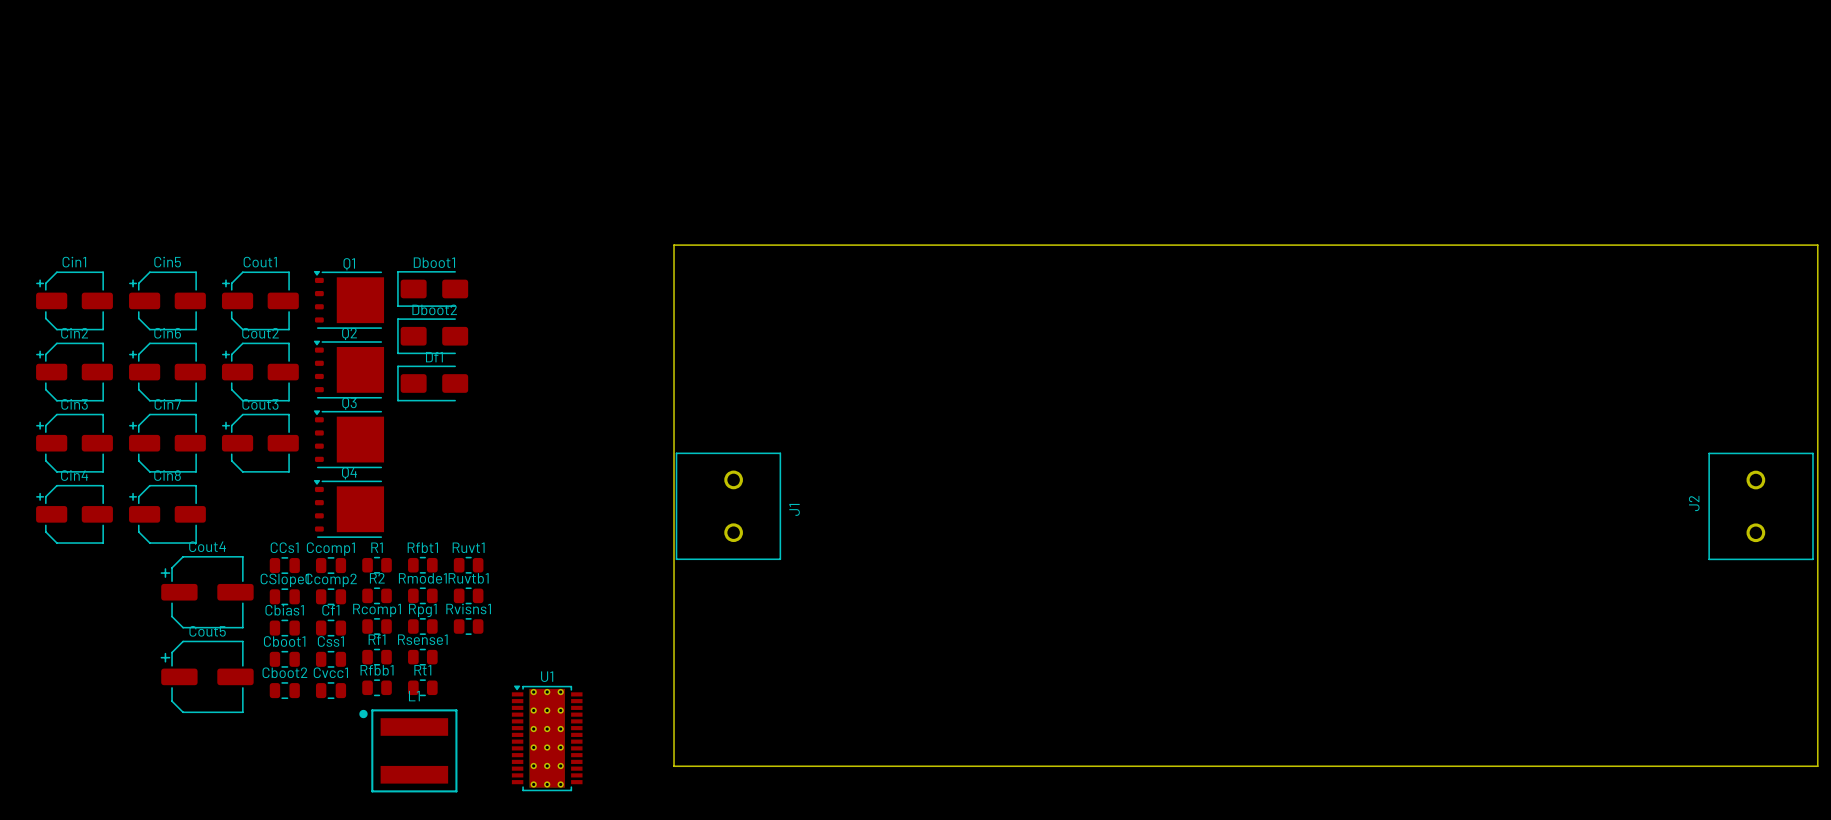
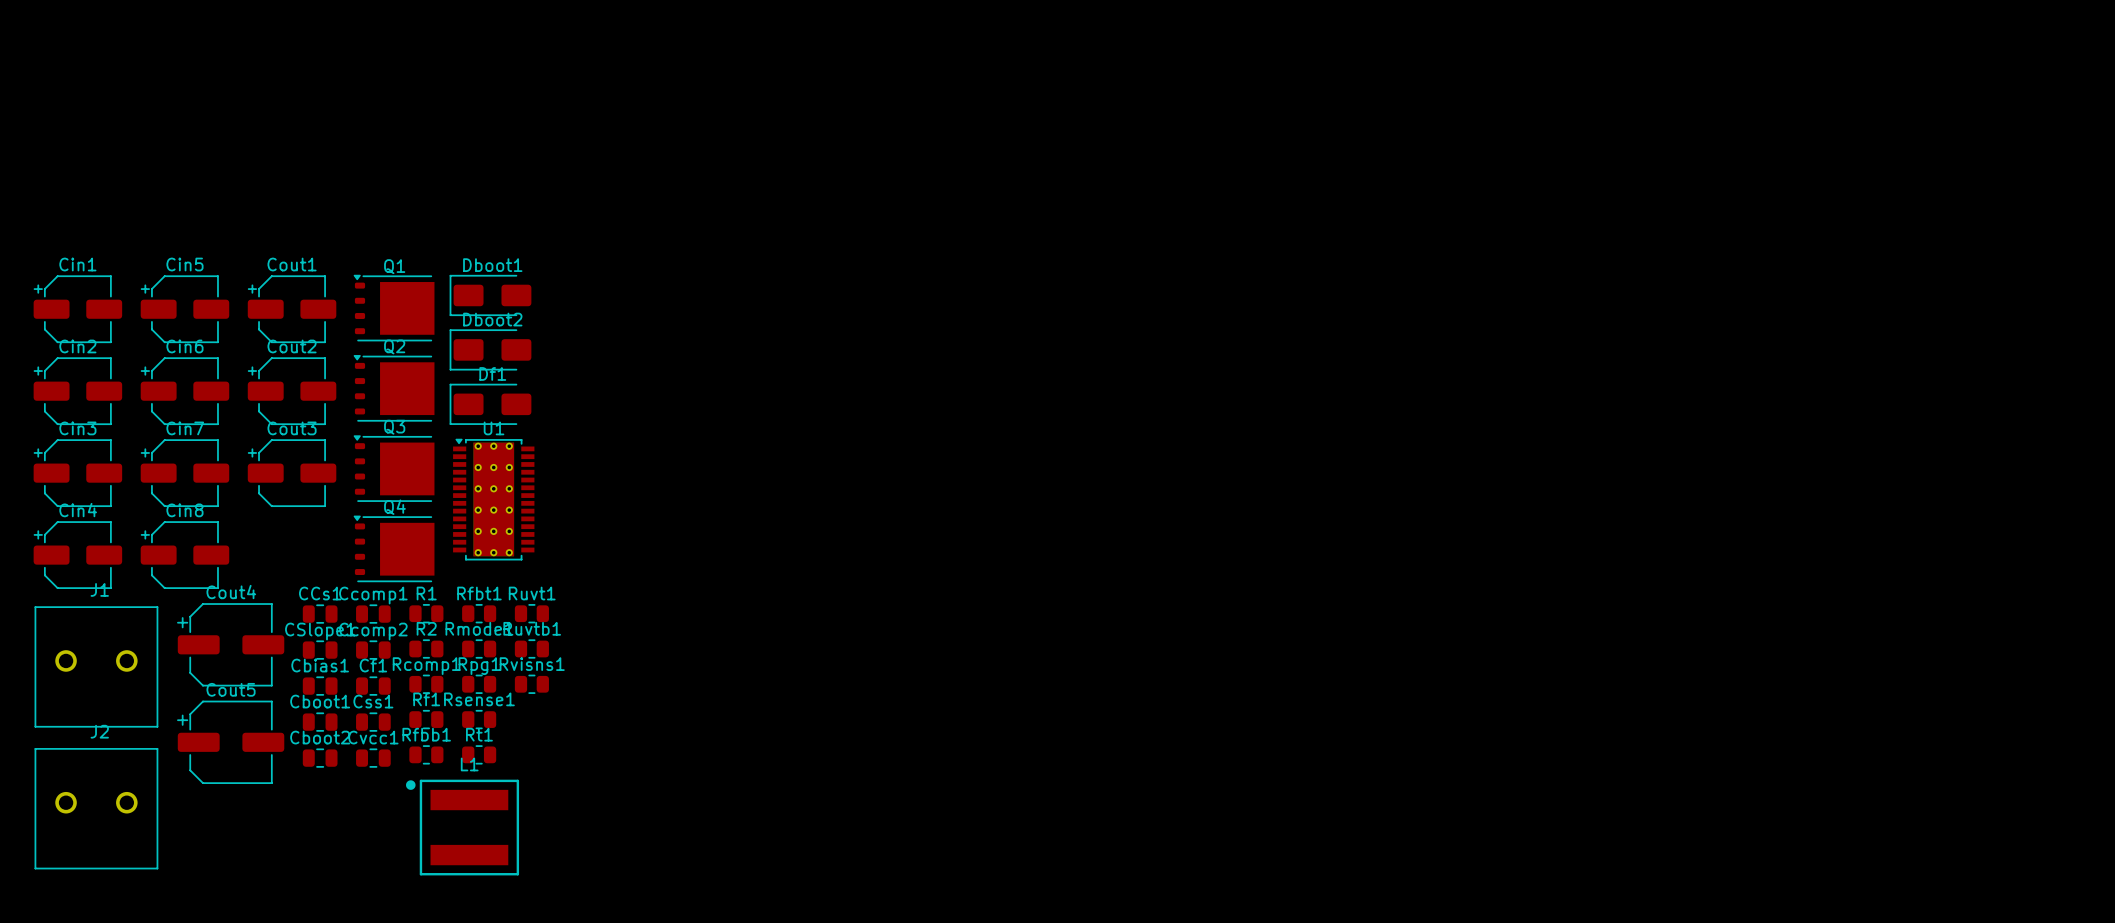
board edge: (674, 245) (1817, 245) (1817, 766) (674, 766) (674, 245) -> none
J1 rotation: 0° (728, 506) -> 90° counterclockwise (96, 666)
J1 position: (728, 506) -> (96, 666)
J2 rotation: 0° (1761, 506) -> 90° clockwise (96, 808)
J2 position: (1761, 506) -> (96, 808)
U1 position: (547, 738) -> (493, 499)

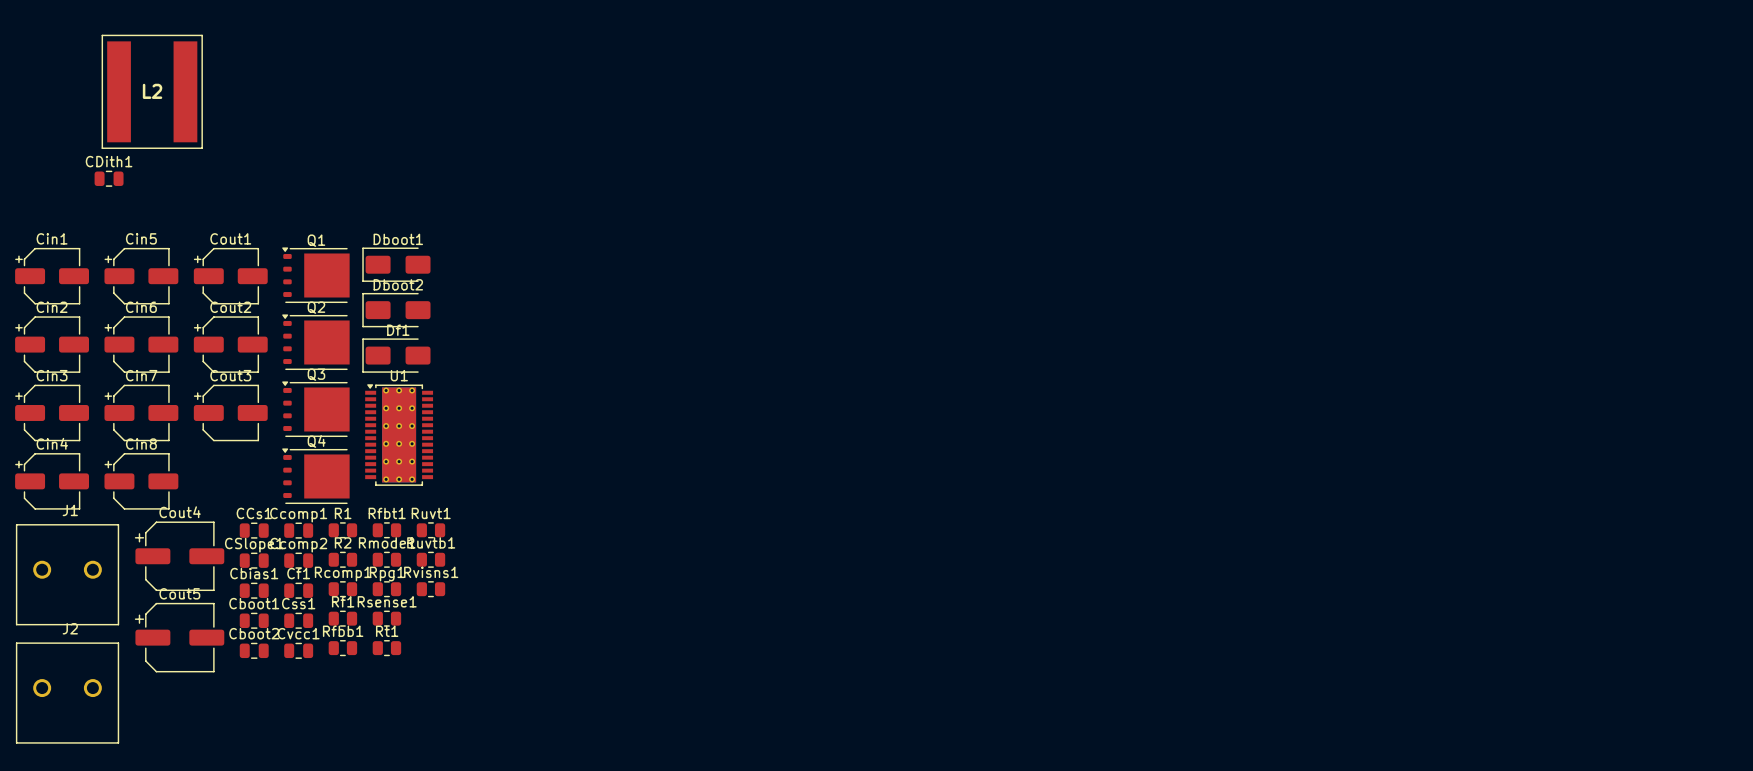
L2: none -> (152, 91)
CDith1: none -> (109, 178)
L1: (462, 827) -> none

